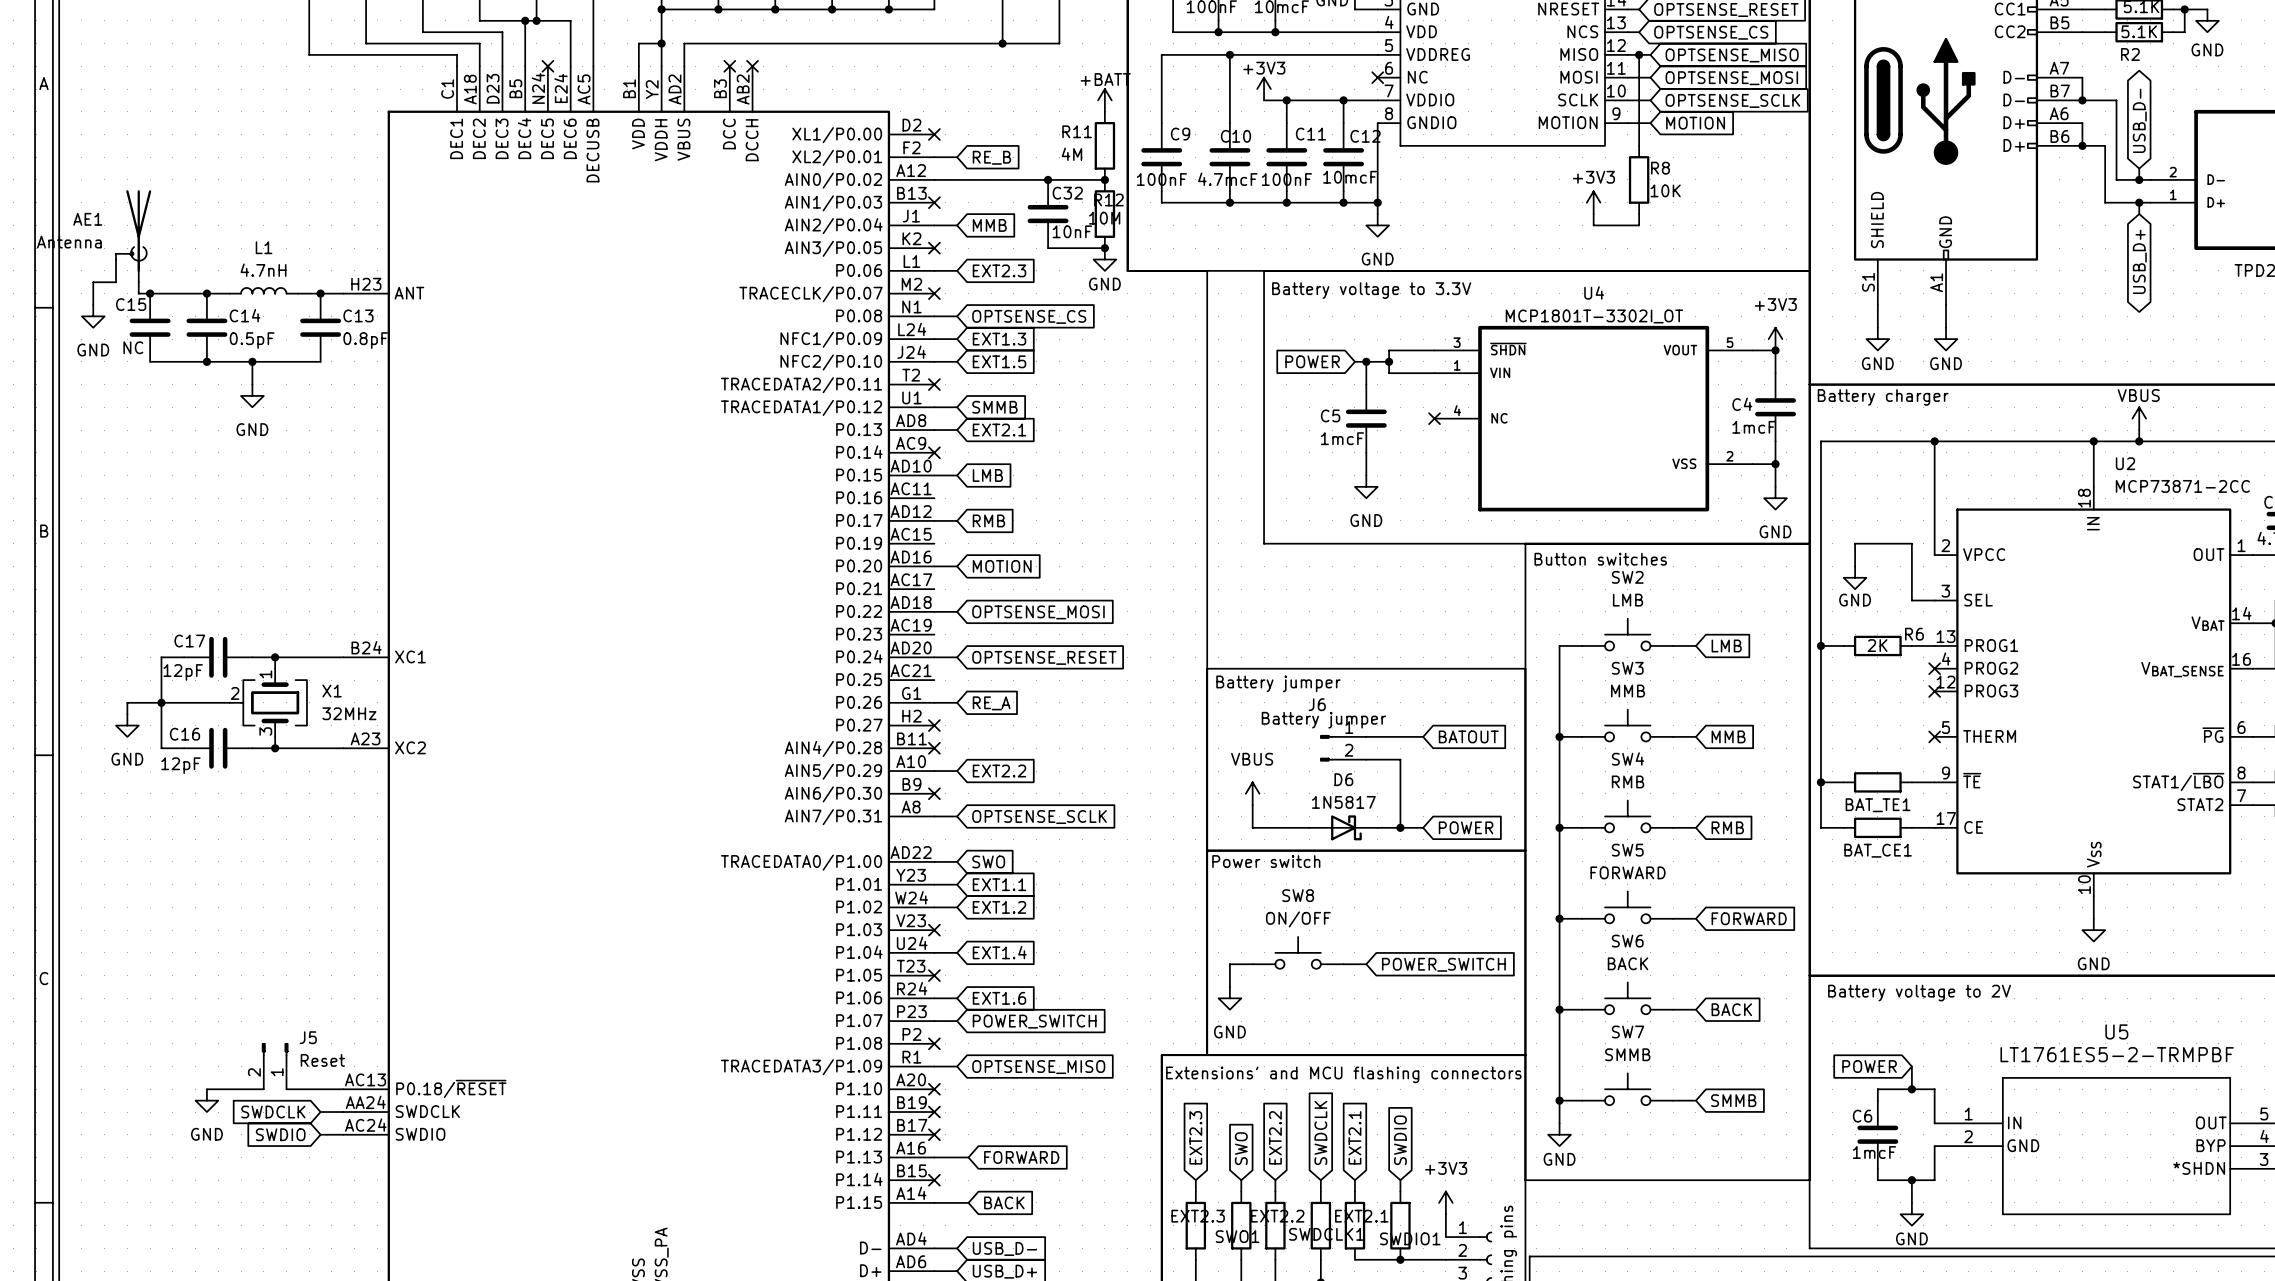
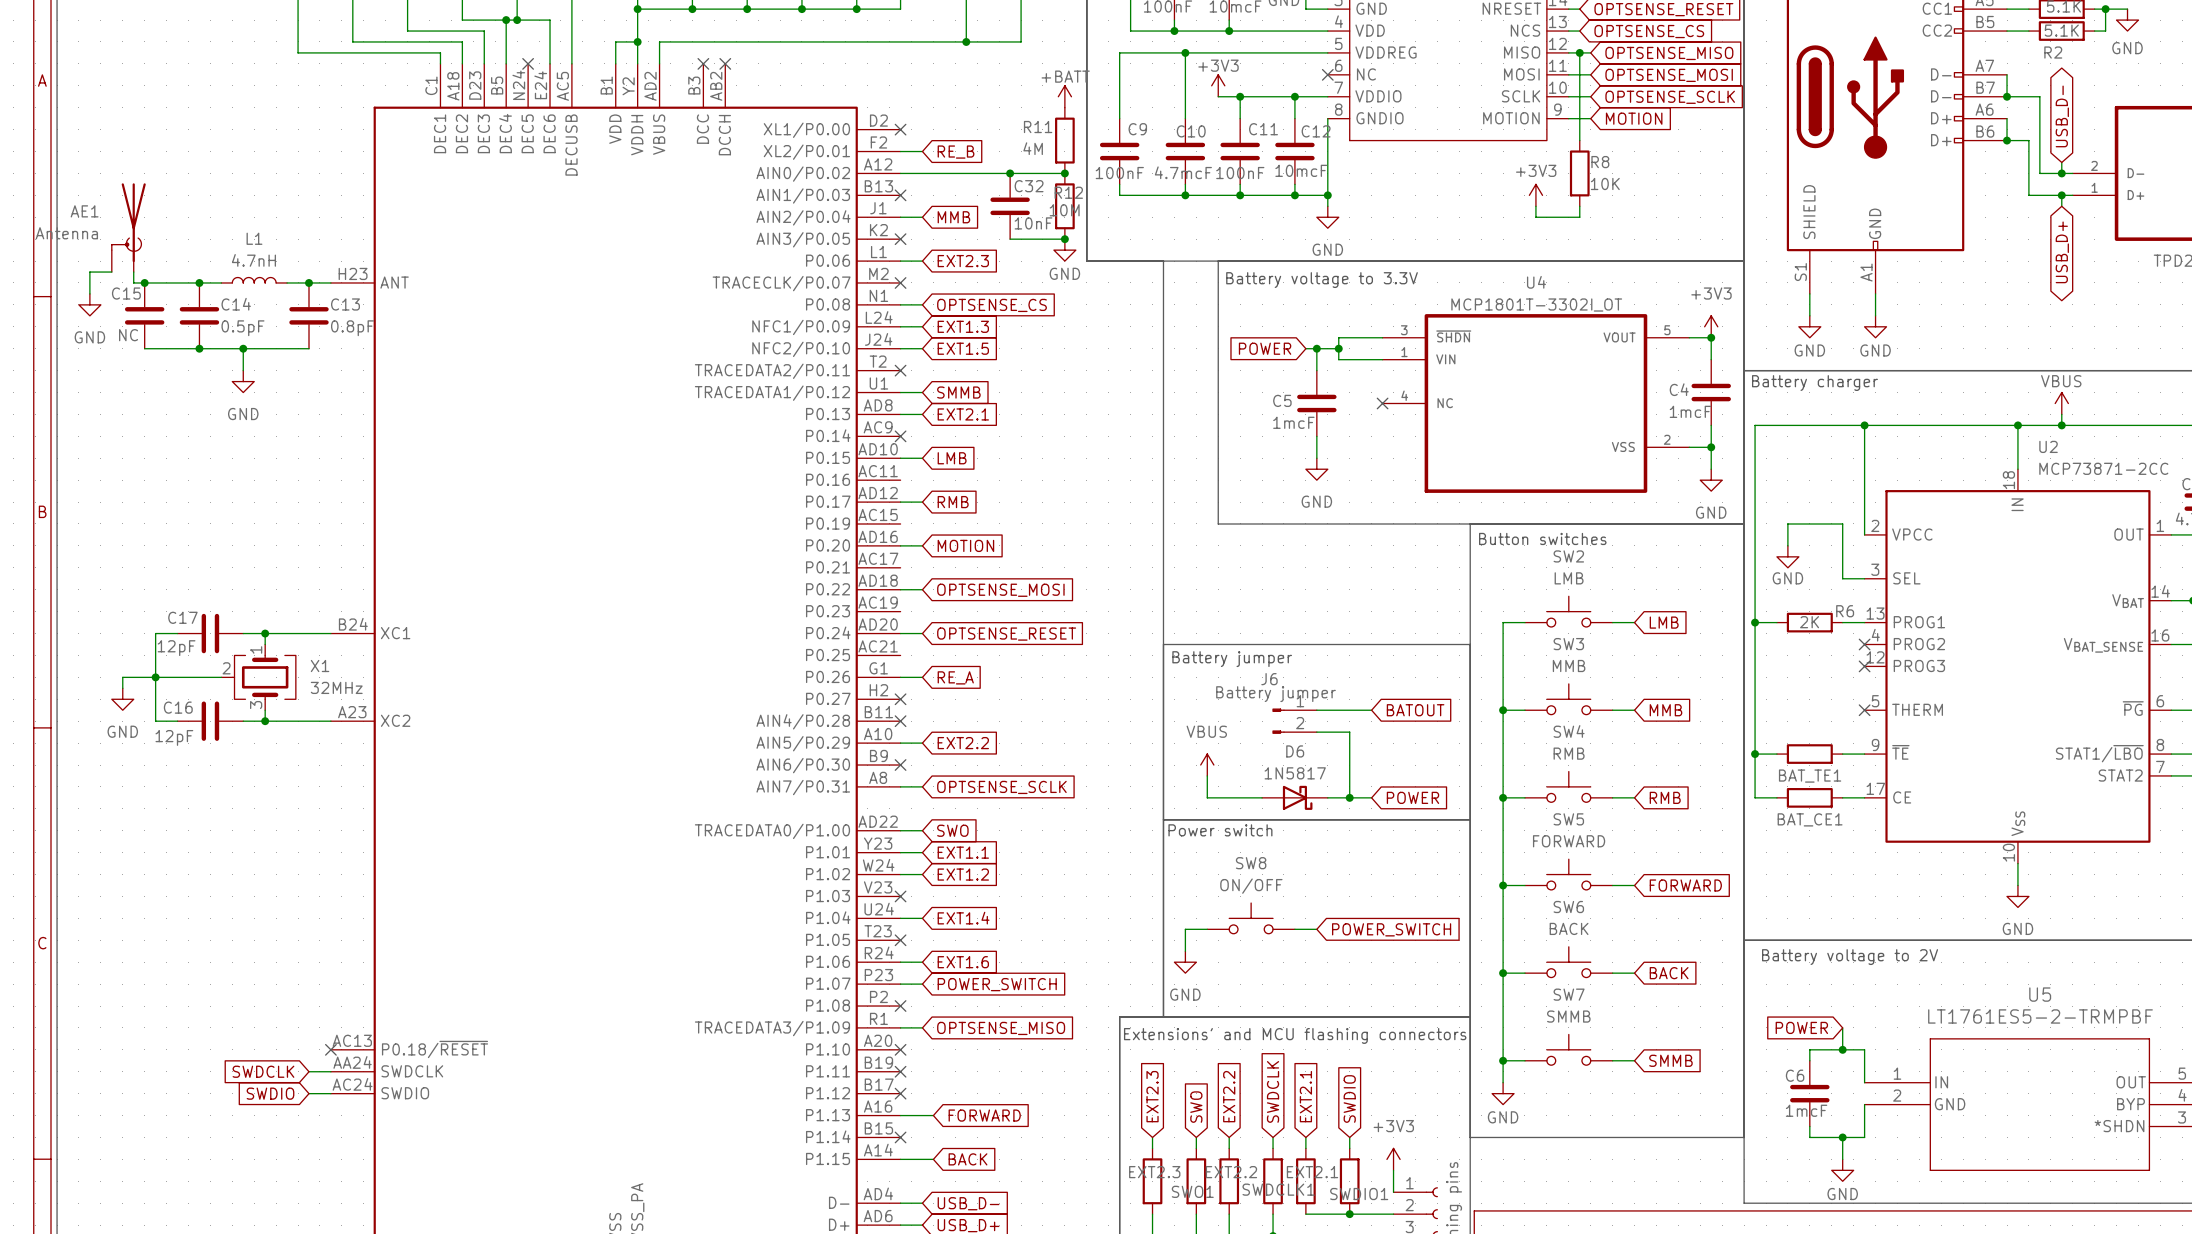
J5: Reset (275, 1066) -> none
wire: (206, 1089) (263, 1089) -> none
wire: (286, 1089) (343, 1089) -> none
no-connect mark: none -> (330, 1049)
power symbol: GND (206, 1100) -> none

